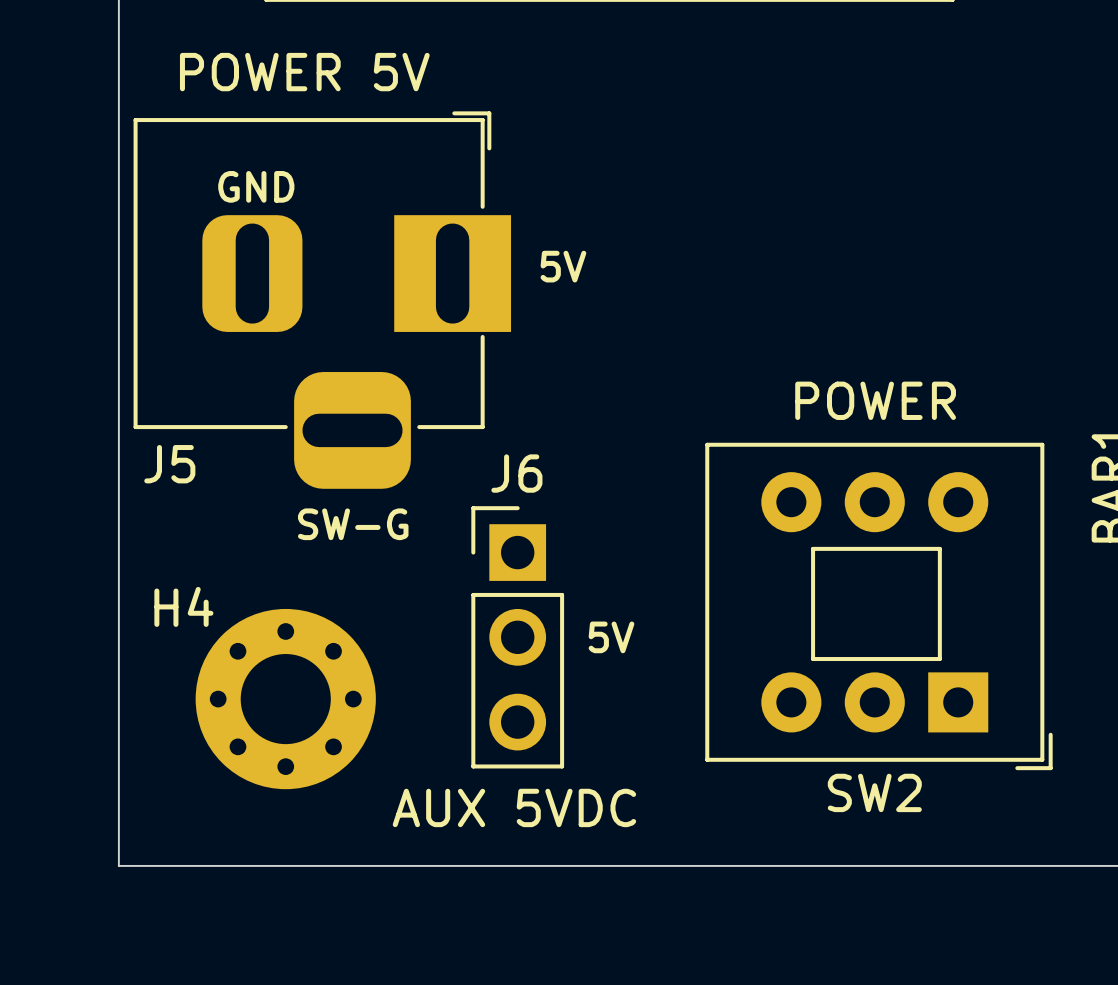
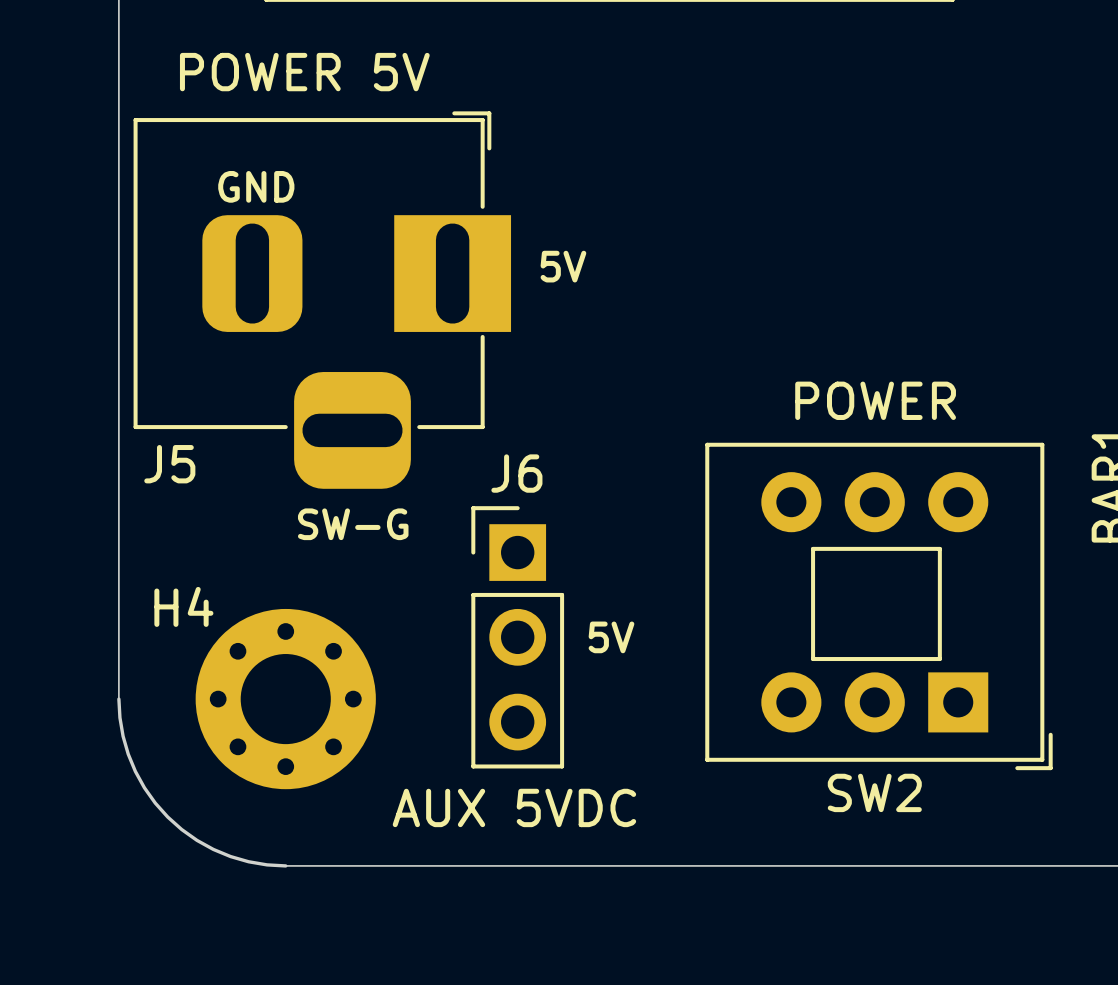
board edge: (118, 699) (118, 865) (285, 865) -> (118, 699) (123, 736) (135, 771) (144, 787) (167, 817) (181, 829) (213, 849) (248, 861) (285, 865)

